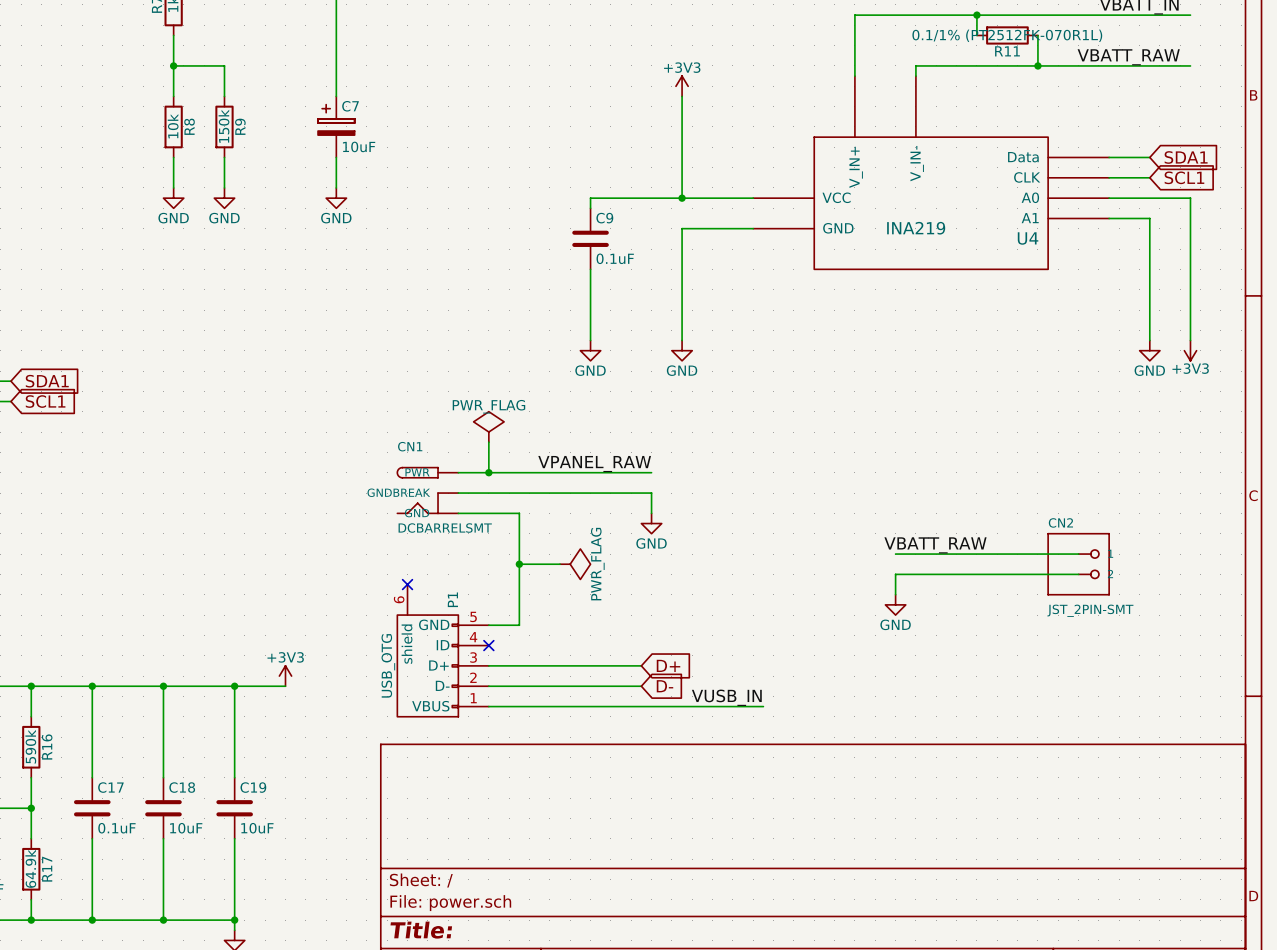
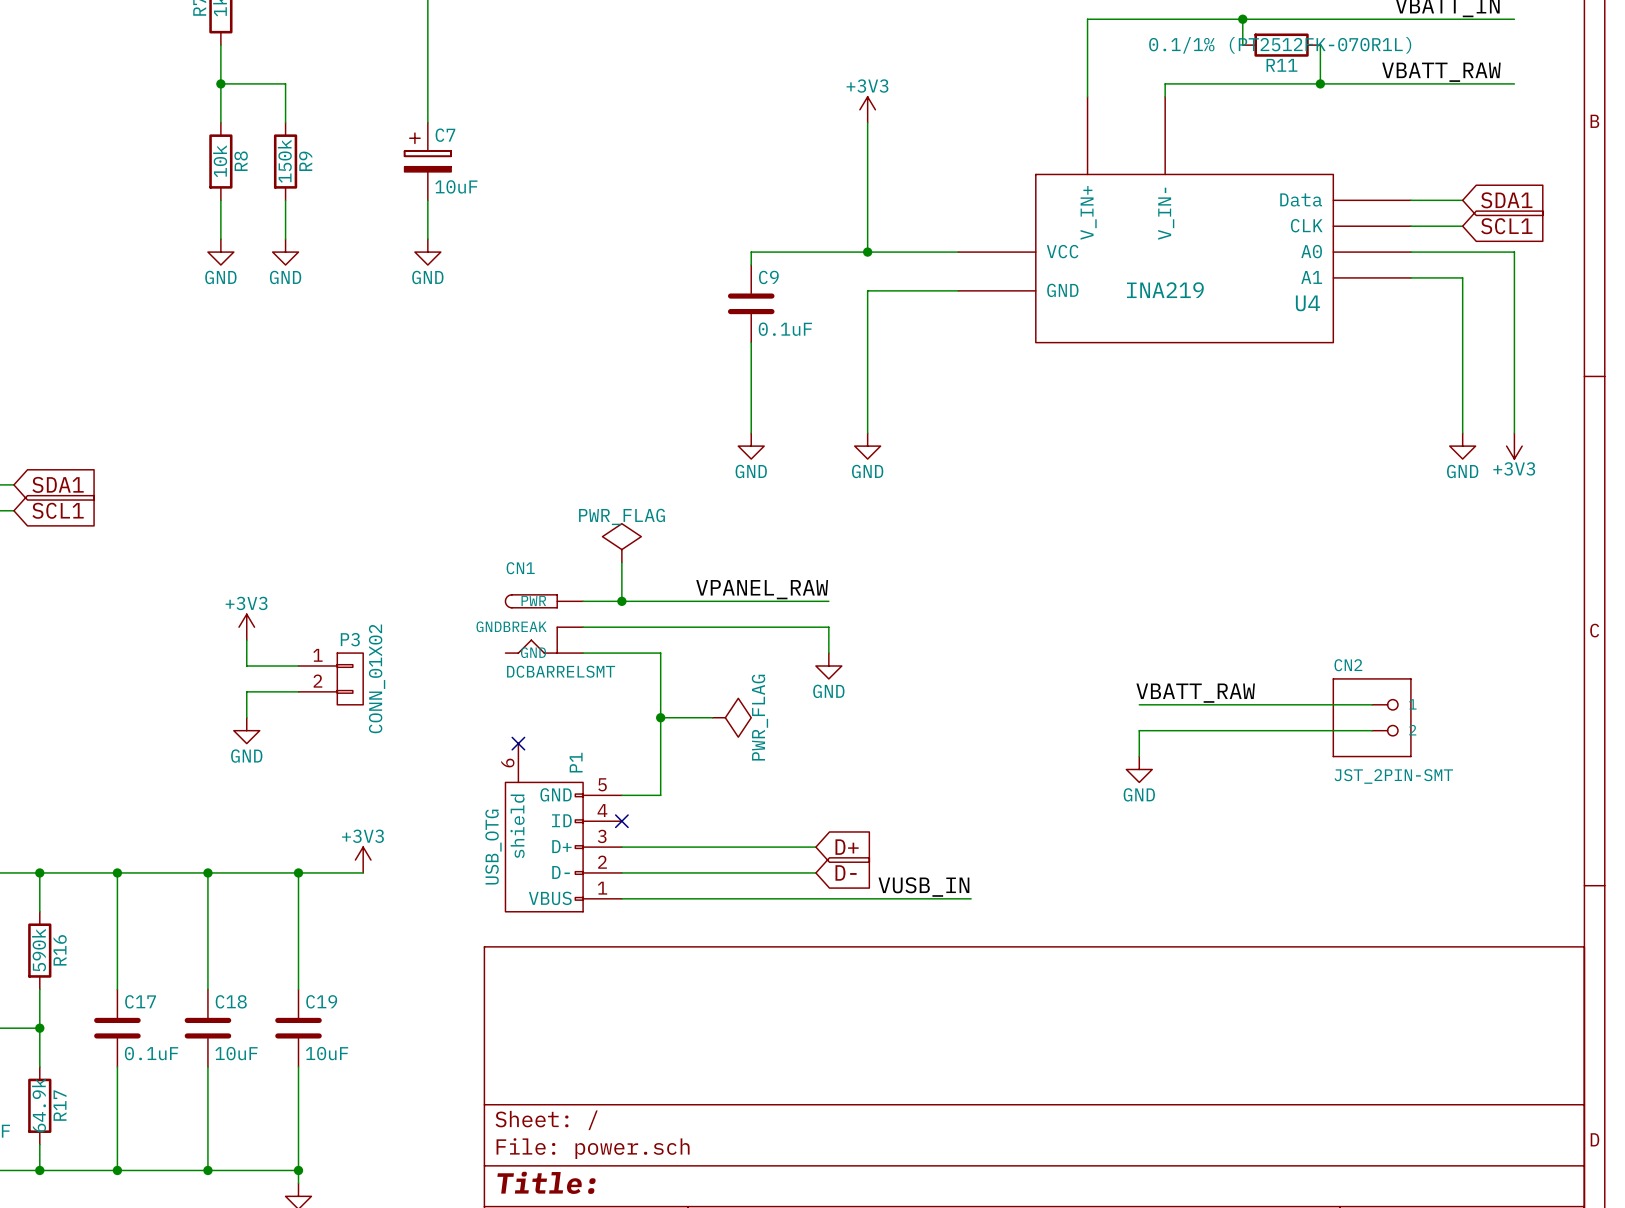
power symbol: none -> +3V3 (246, 627)
wire: none -> (246, 640) (246, 666) (298, 666)
P3: none -> CONN_01X02 (330, 678)
wire: none -> (298, 691) (246, 691) (246, 717)
power symbol: none -> GND (246, 730)

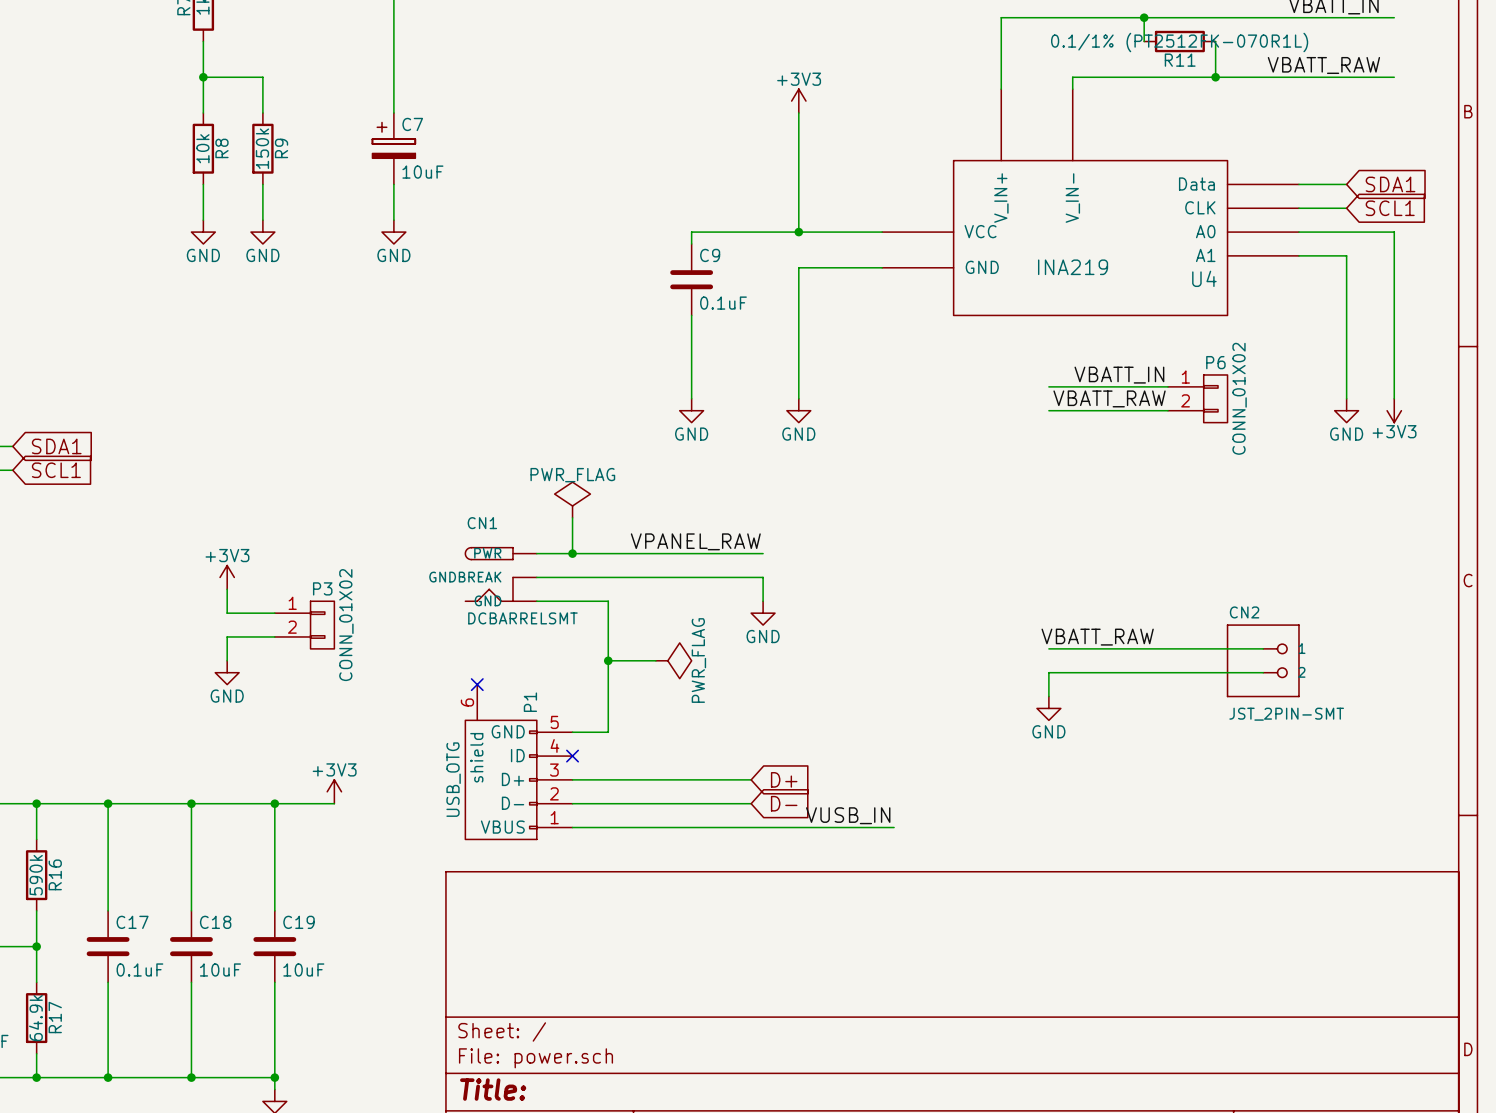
label: none -> VBATT_IN (1119, 375)
wire: none -> (1048, 386) (1167, 386)
P6: none -> CONN_01X02 (1197, 398)
label: none -> VBATT_RAW (1109, 398)
wire: none -> (1048, 410) (1167, 410)

